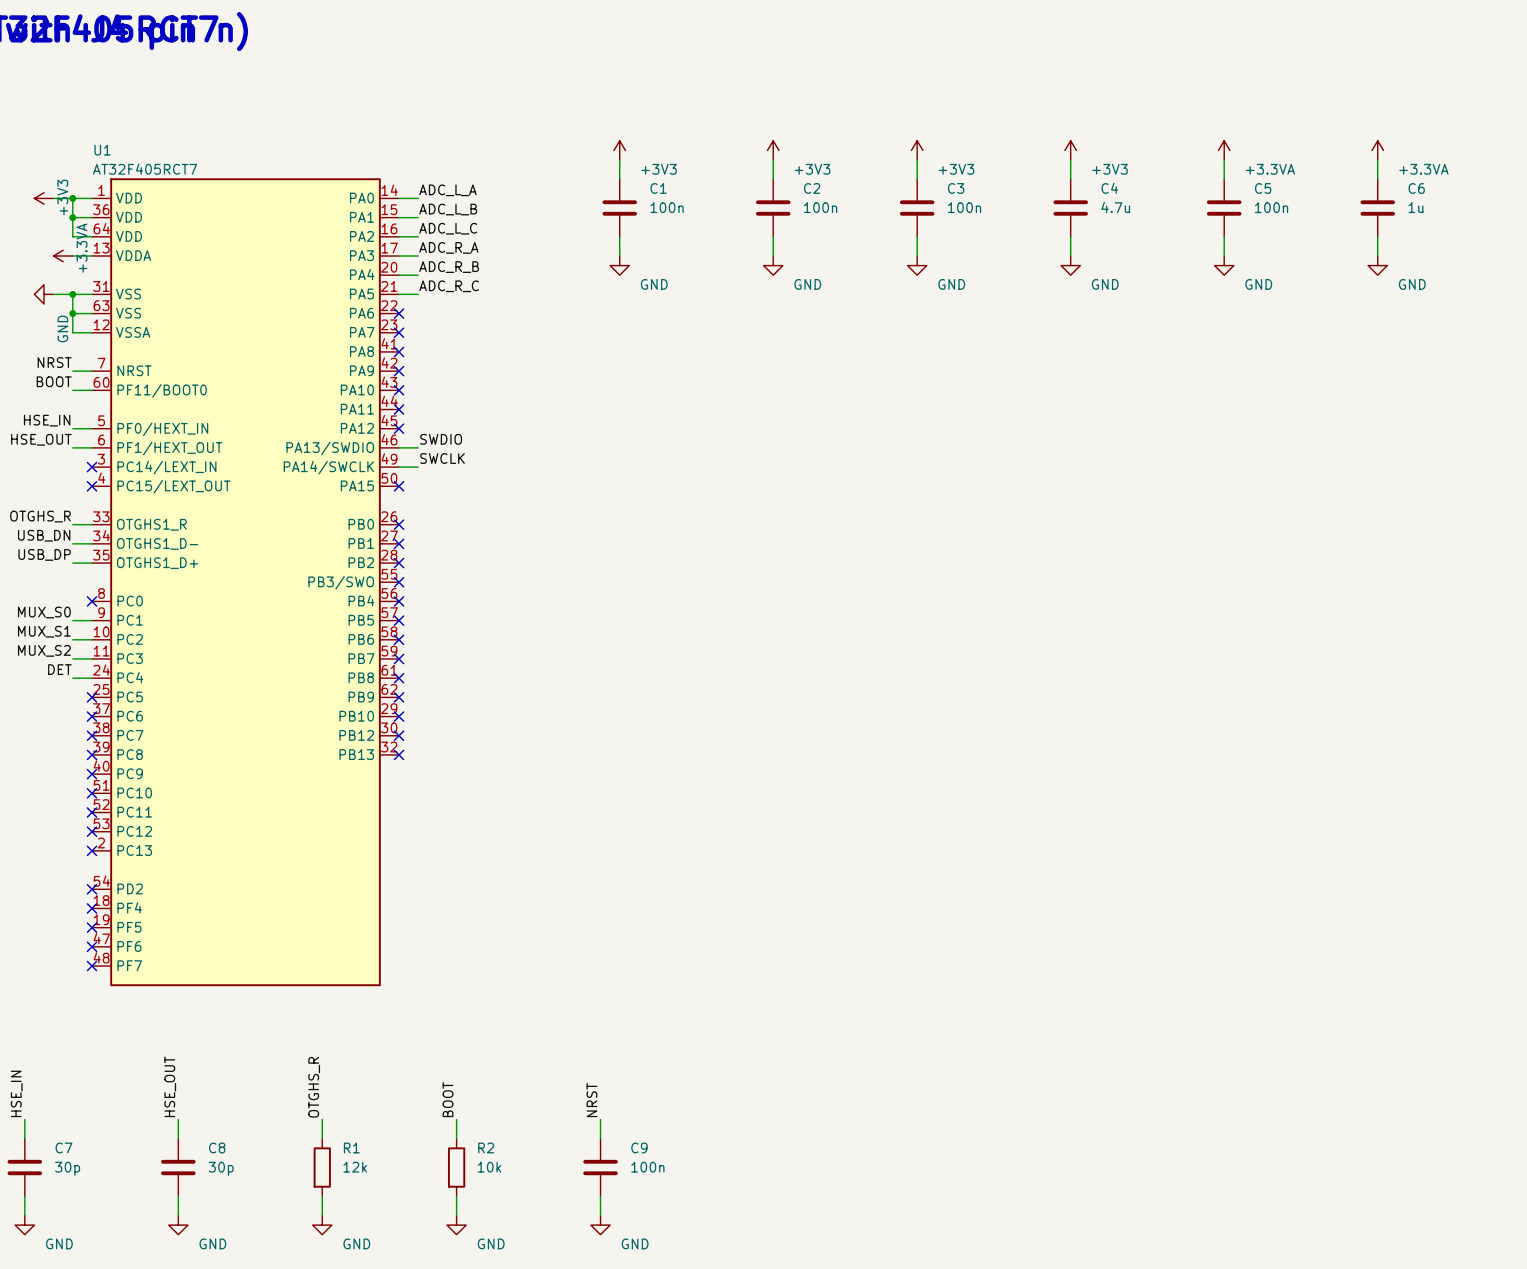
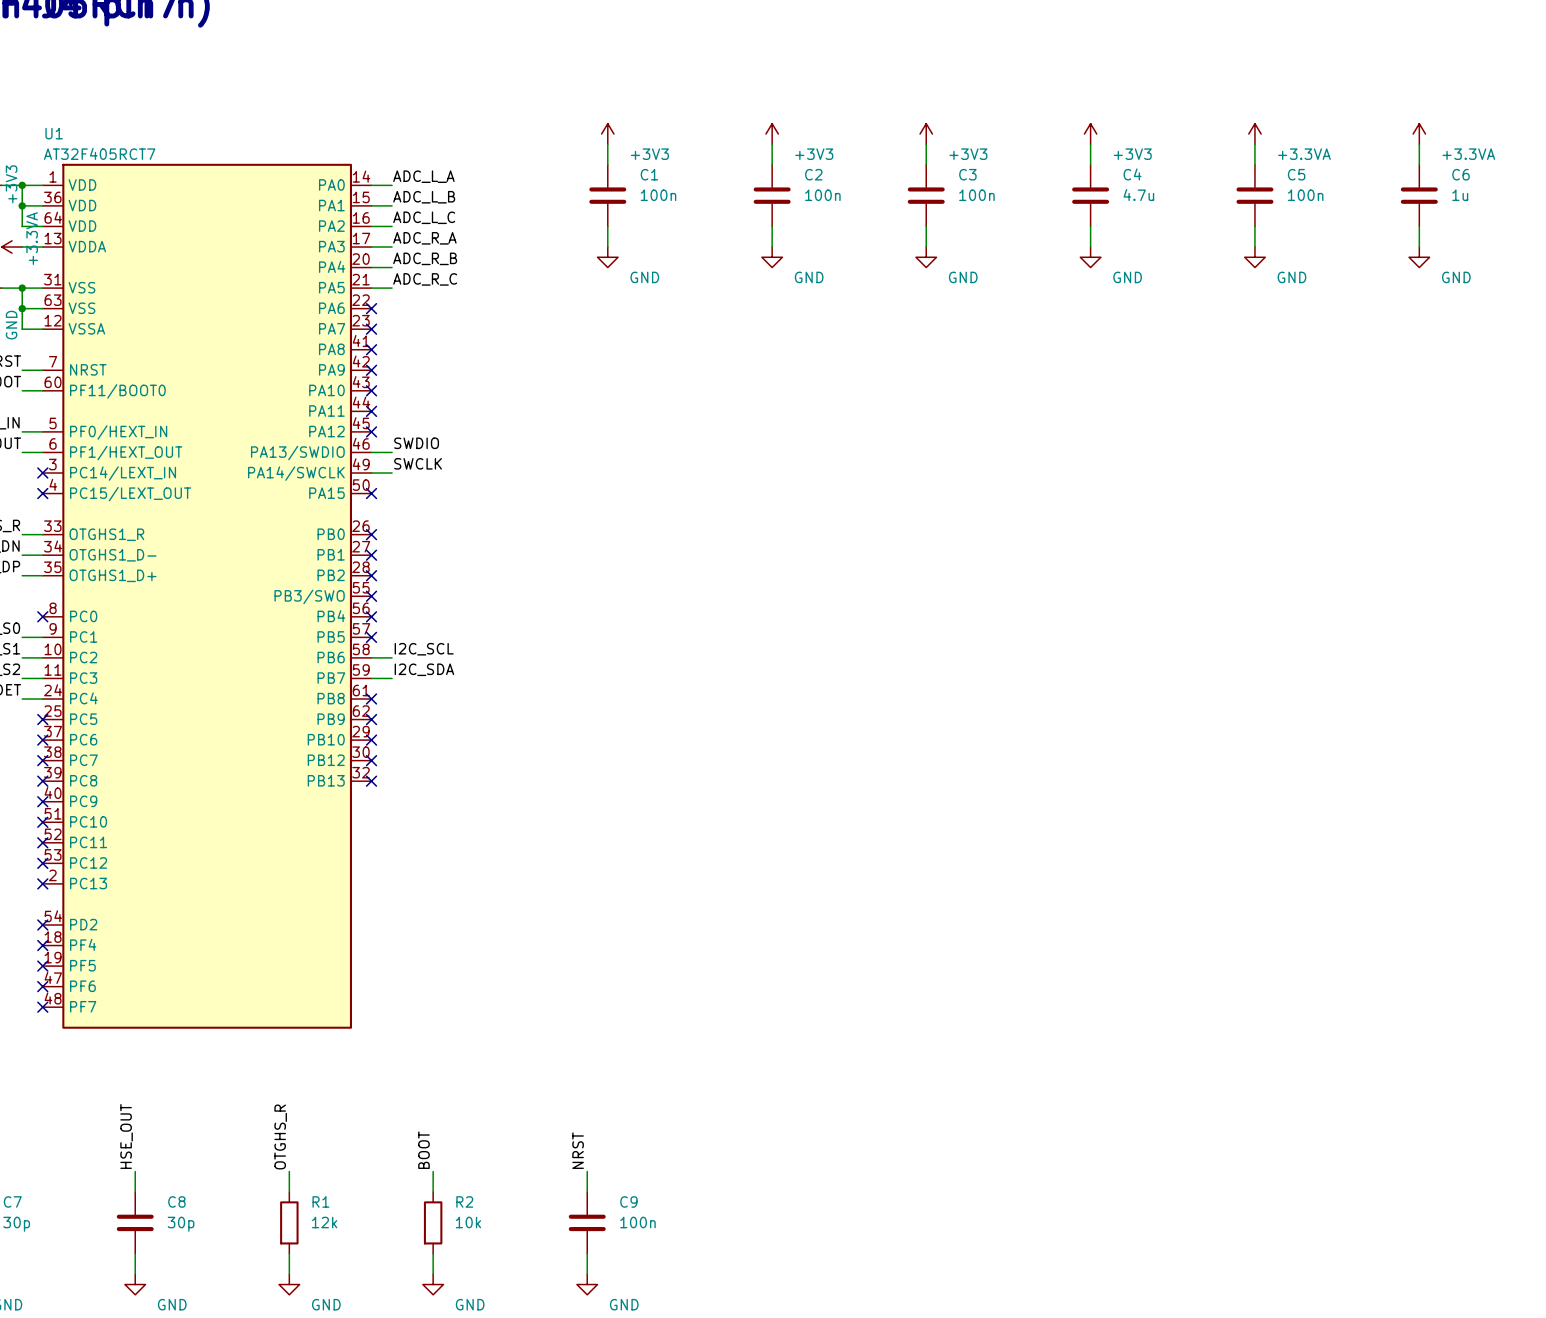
label: none -> I2C_SCL (424, 649)
wire: none -> (371, 657) (392, 657)
no-connect mark: (399, 639) -> none
label: none -> I2C_SDA (424, 669)
wire: none -> (371, 678) (392, 678)
no-connect mark: (399, 658) -> none

